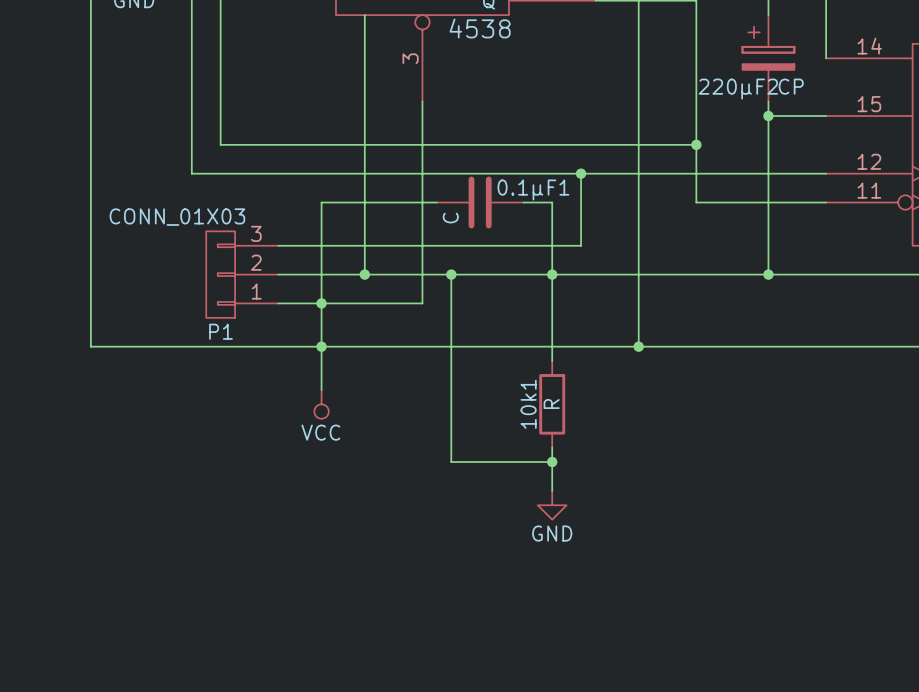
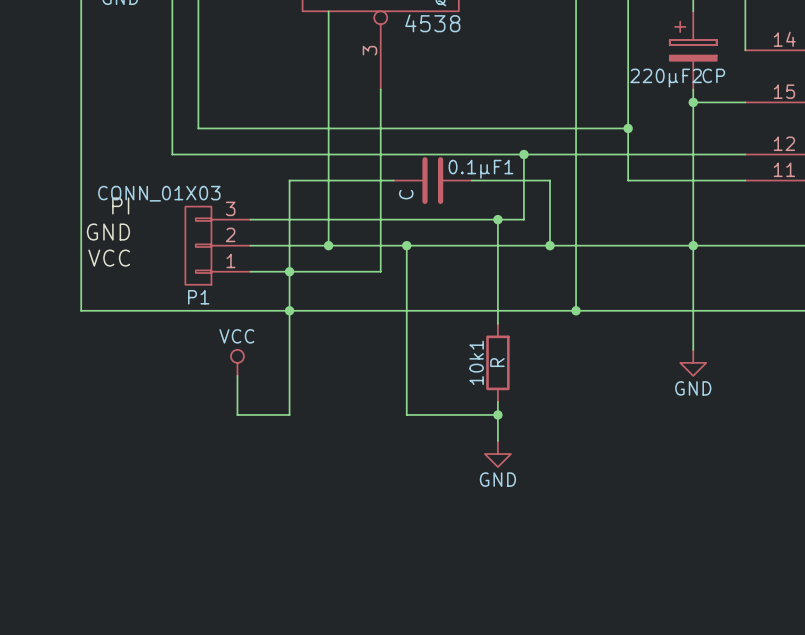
wire: (552, 202) (552, 245) -> (497, 180) (550, 180) (550, 245)
label: none -> PI (120, 205)
junction: none -> (497, 219)
label: none -> GND (108, 232)
junction: (552, 274) -> none
junction: none -> (550, 245)
wire: none -> (693, 245) (693, 349)
label: none -> VCC (109, 258)
wire: none -> (289, 349) (289, 414) (237, 414) (237, 375)
power symbol rotation: 0° (321, 404) -> 180° (237, 362)
power symbol position: VCC (321, 404) -> VCC (237, 362)
power symbol: none -> GND (693, 362)

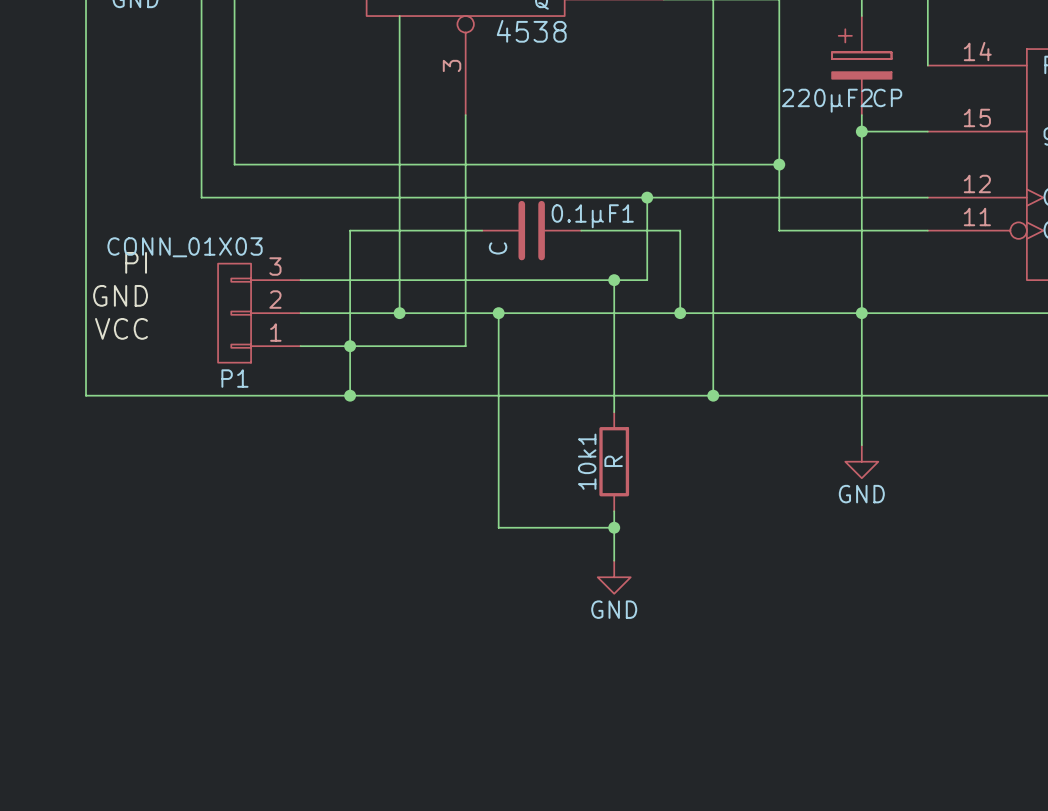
wire: (289, 310) (289, 414) (237, 414) (237, 375) -> none
power symbol: VCC (237, 362) -> none

